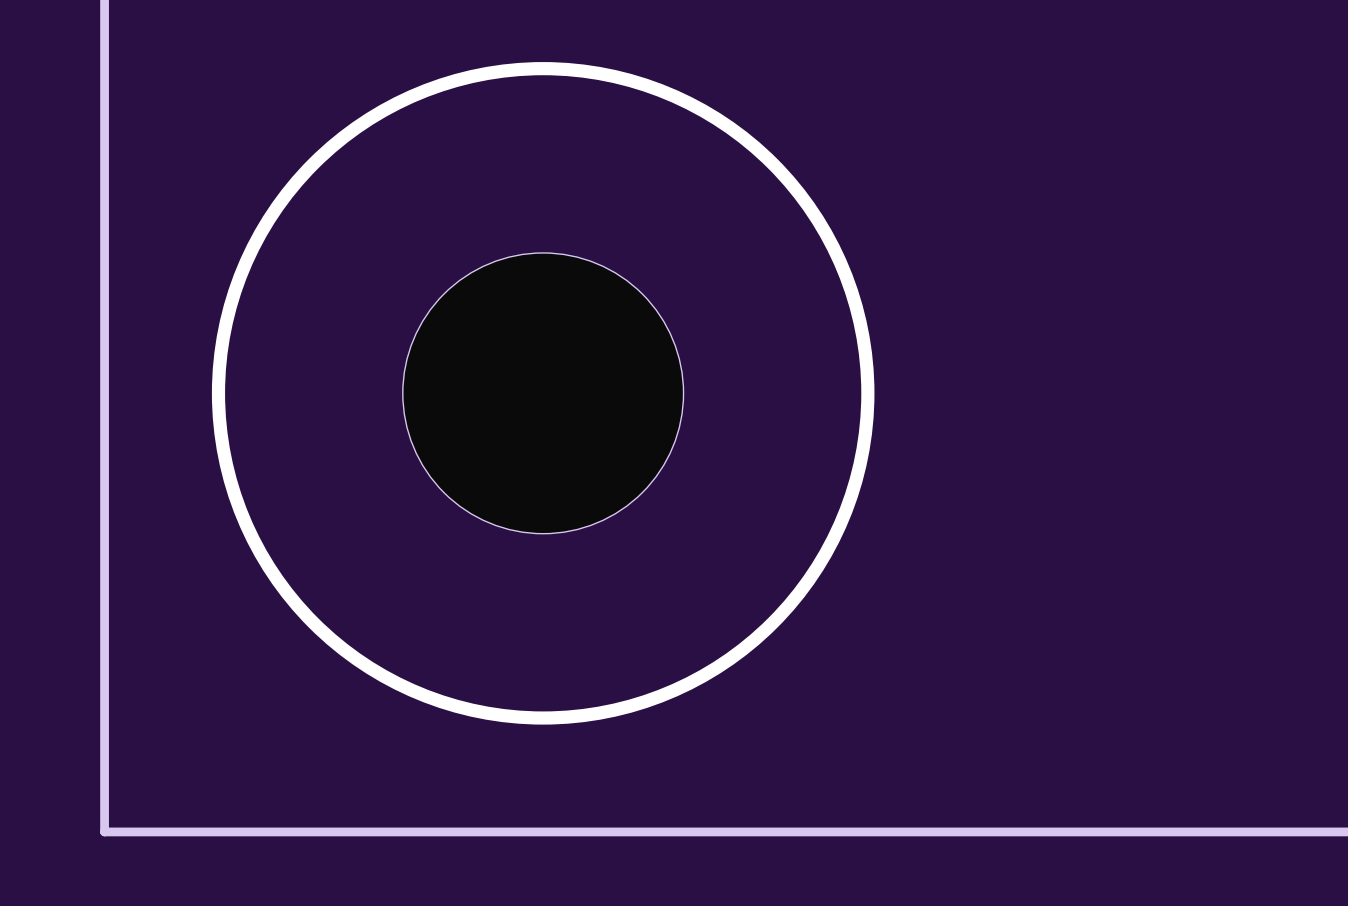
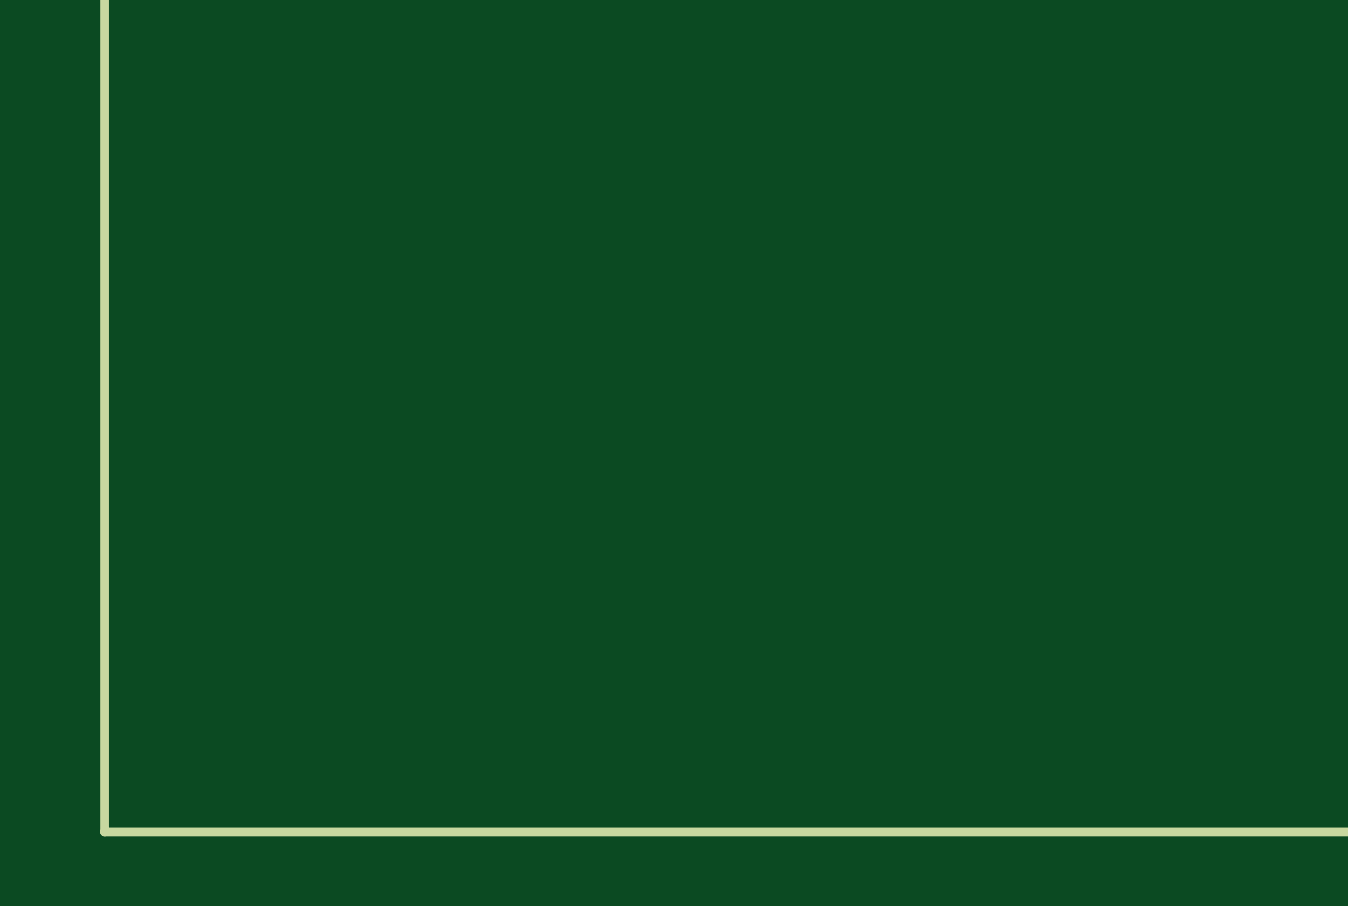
part: (543, 393) -> none

